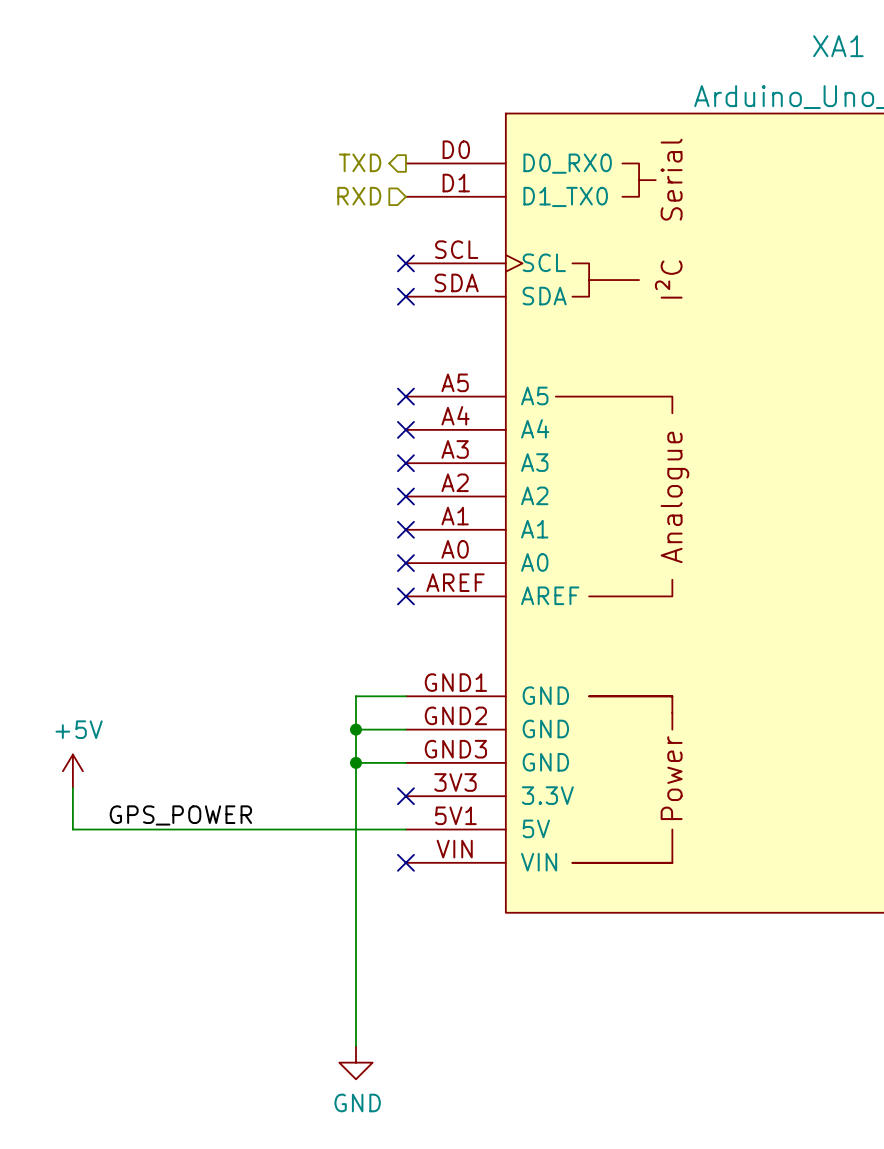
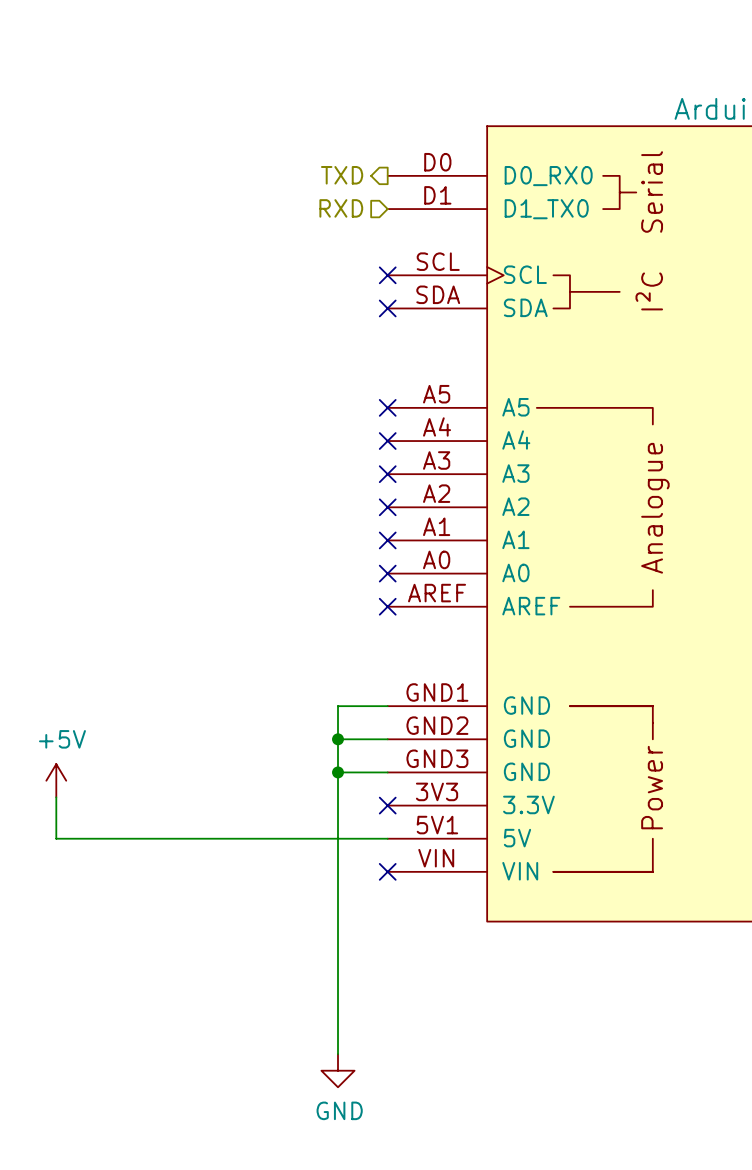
label: GPS_POWER (180, 815) -> none

